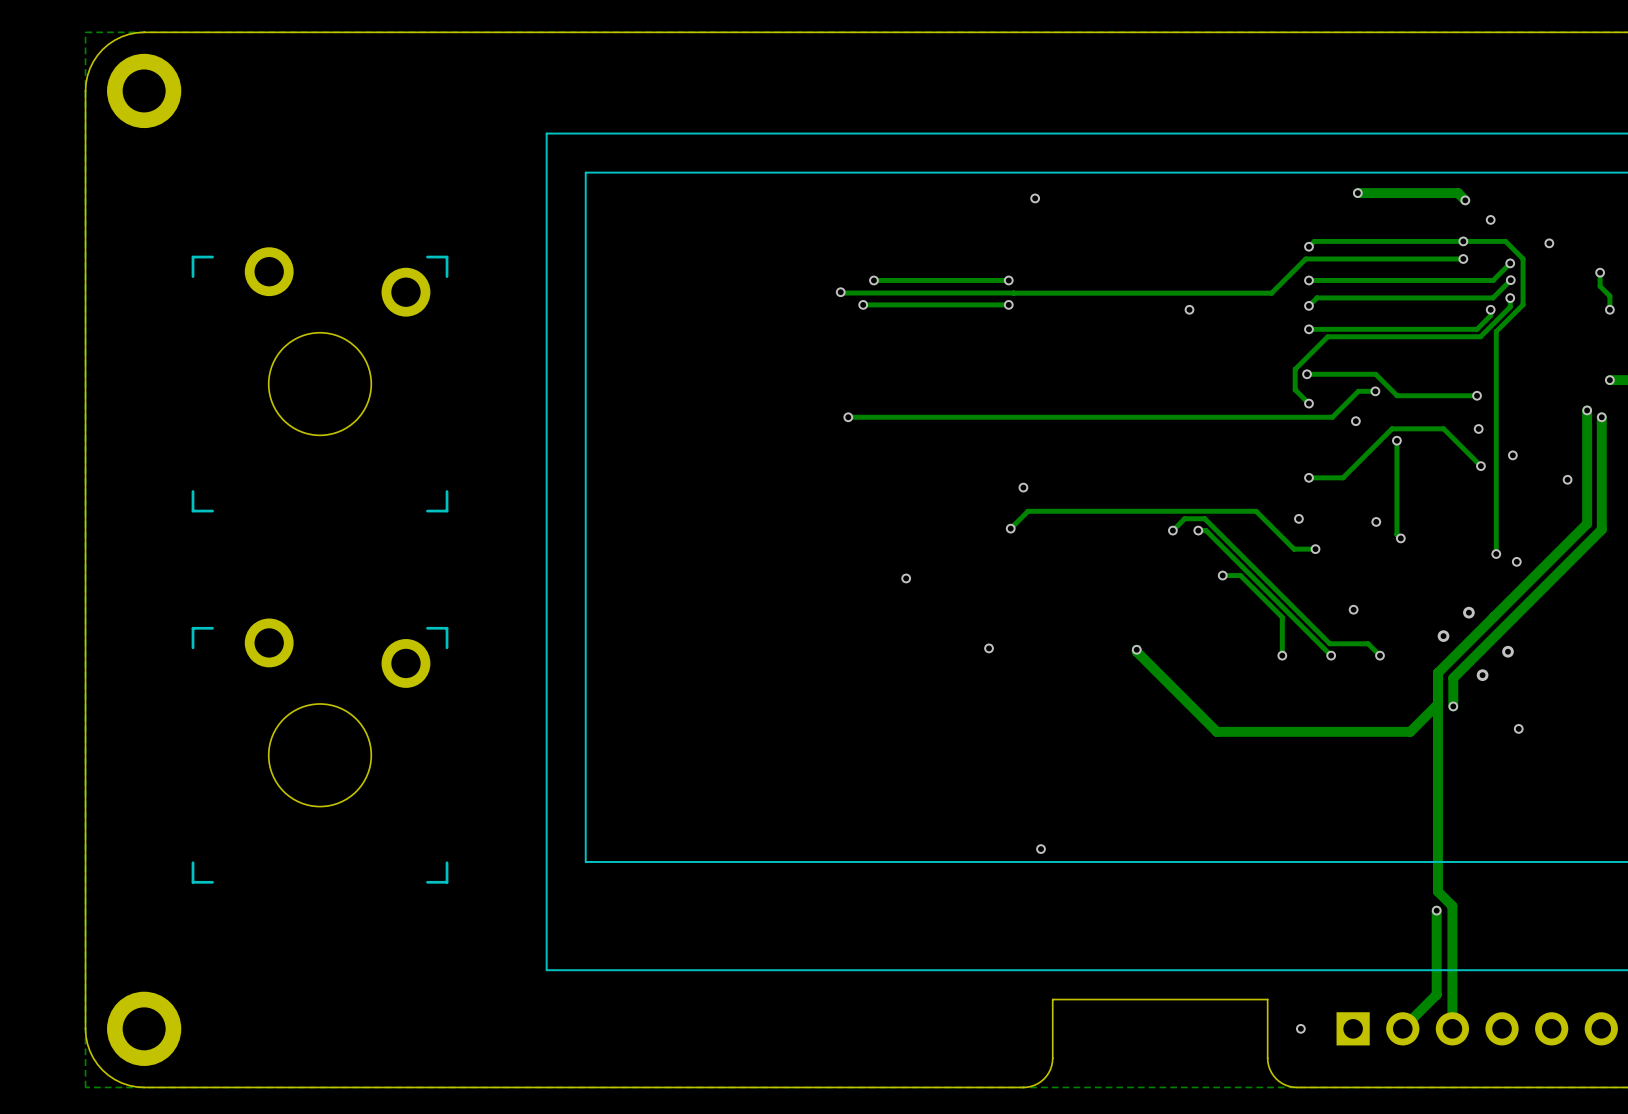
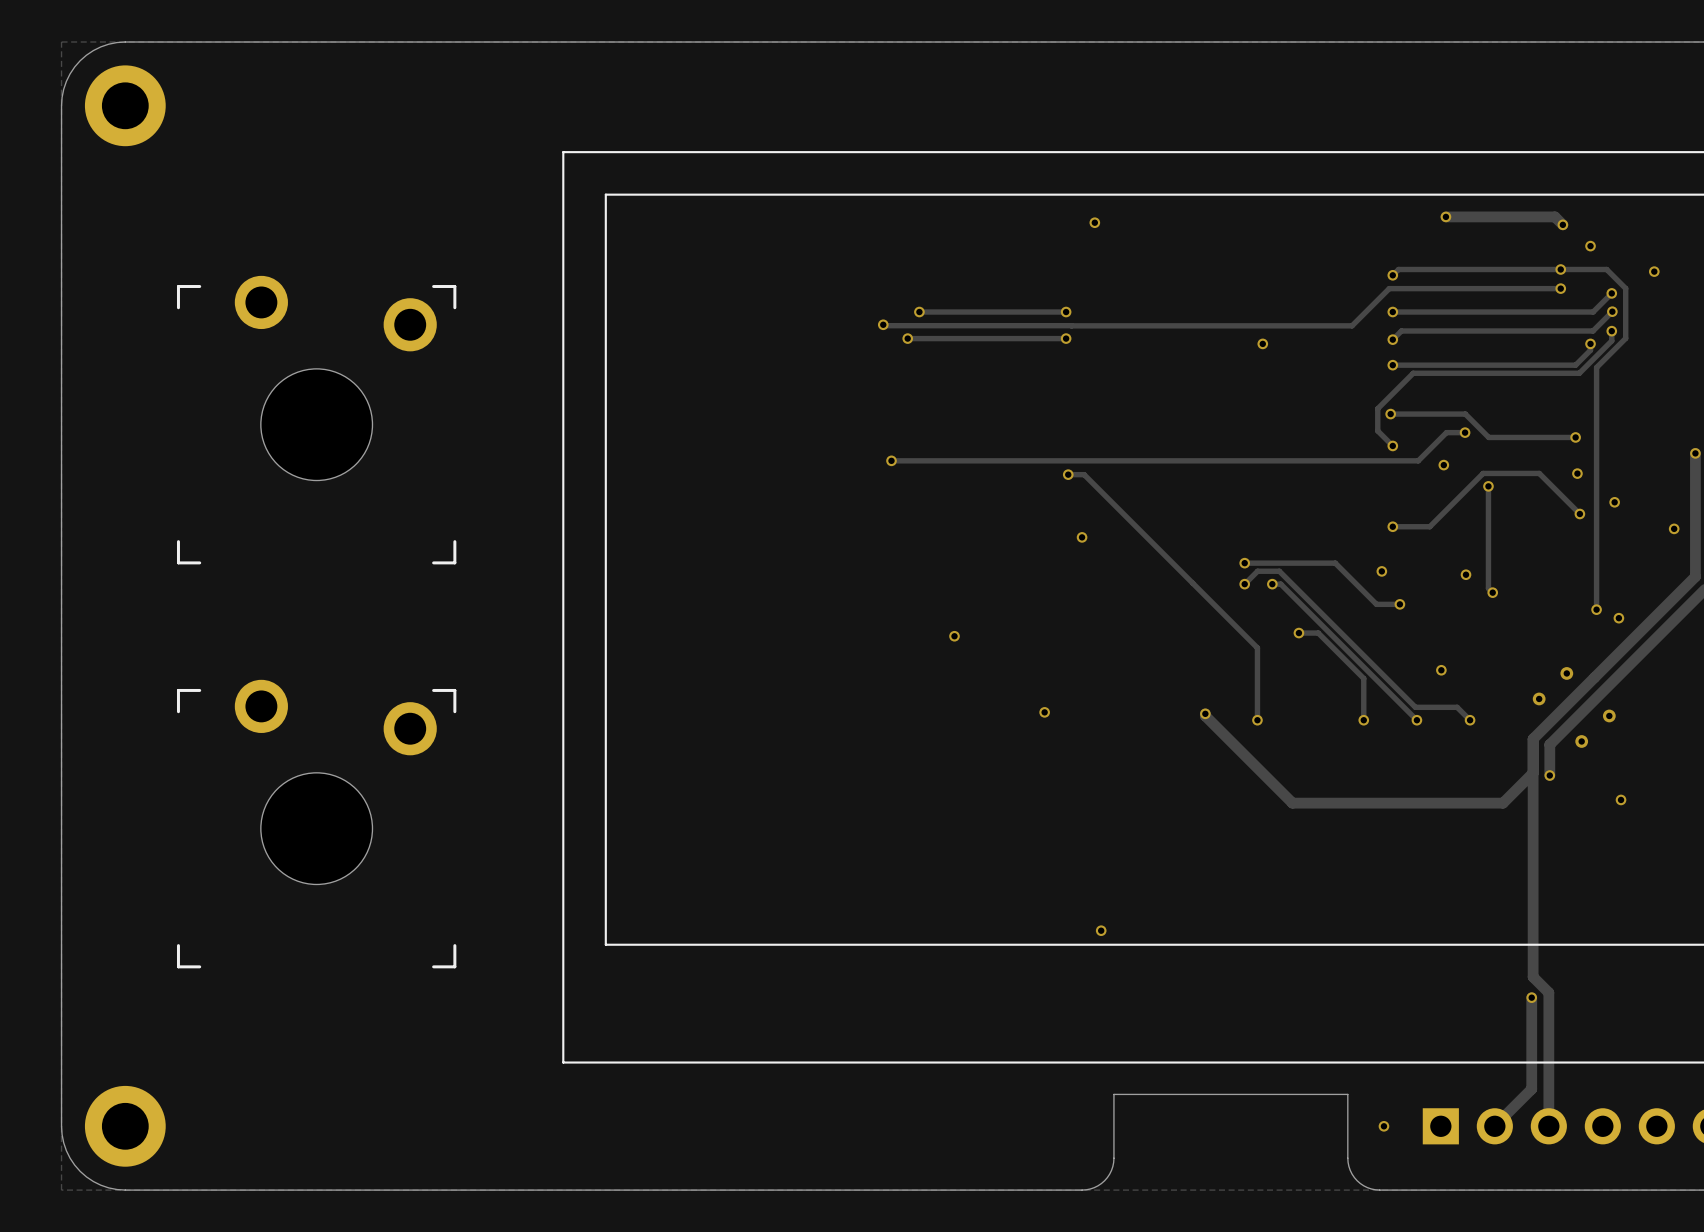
track: none -> (1068, 474) (1084, 474) (1257, 647) (1257, 720)
via: none -> (1068, 474)
track: (1172, 511) (1028, 511) (1010, 528) -> none
via: none -> (1244, 563)
via: (1010, 528) -> none
via: none -> (1257, 720)

